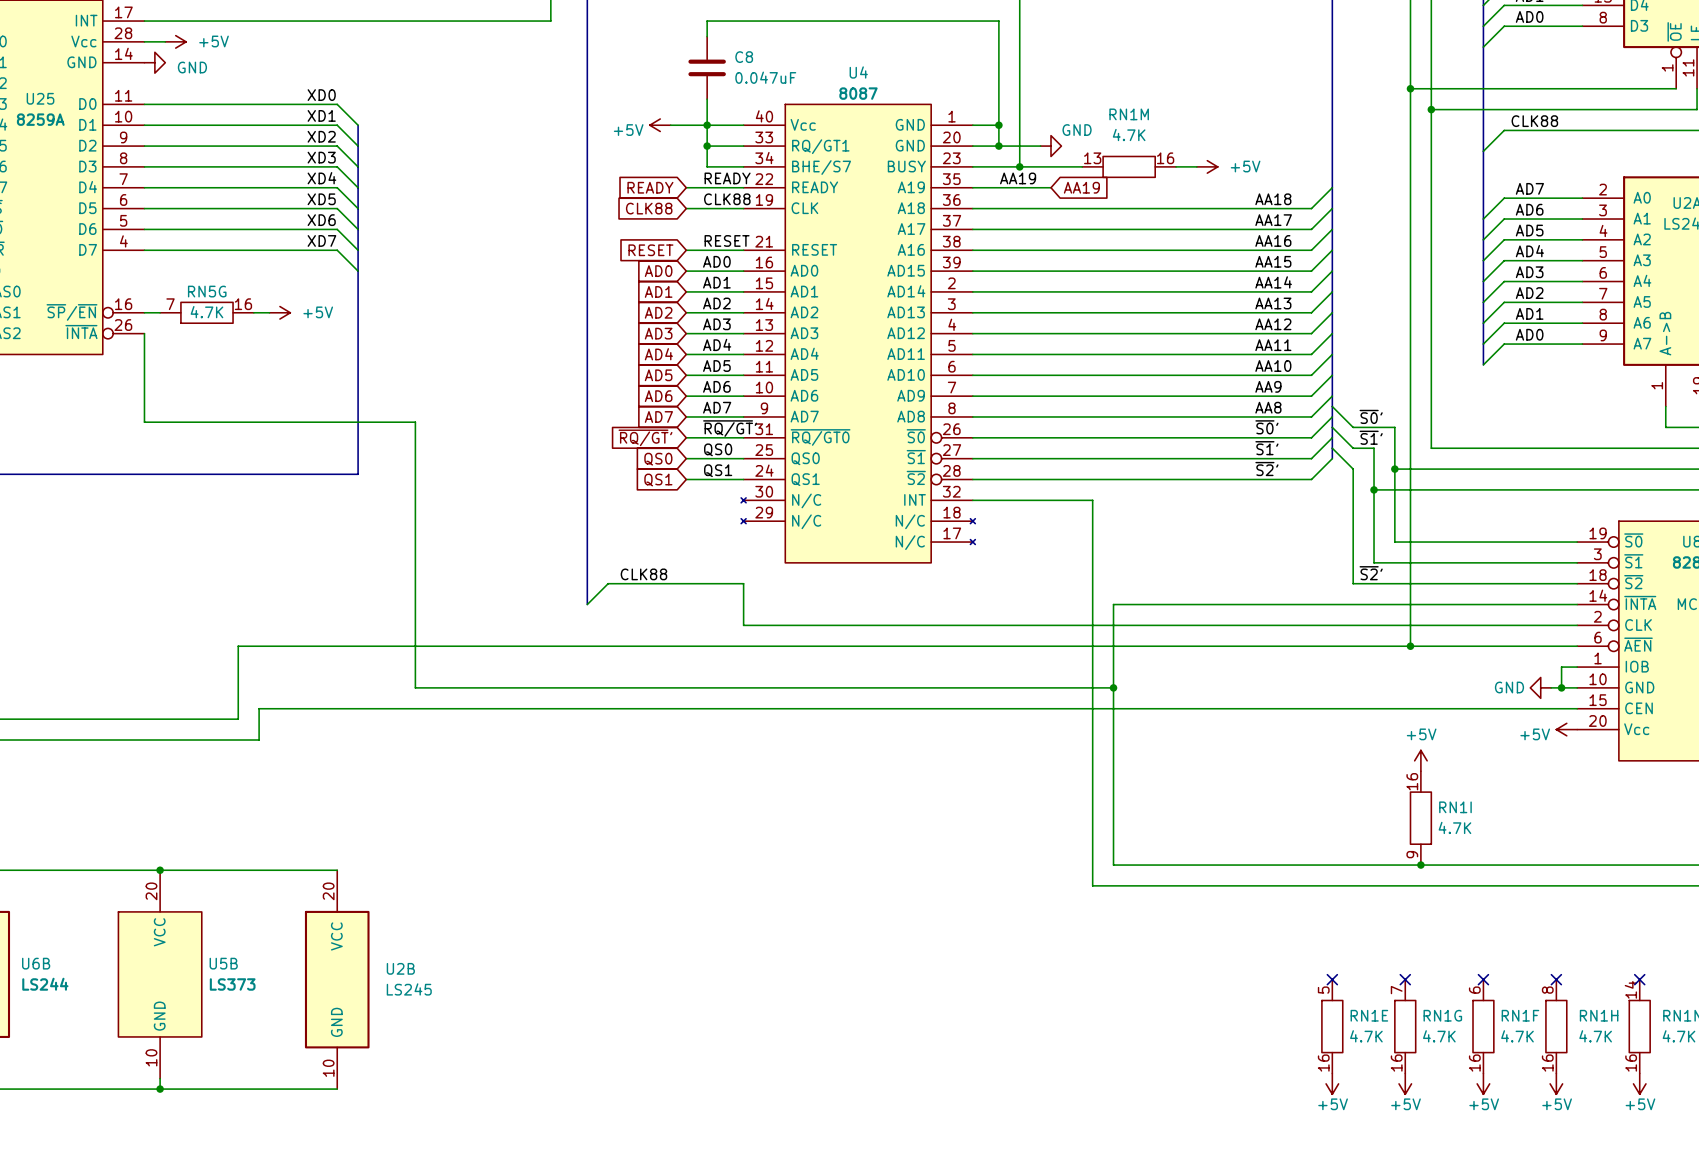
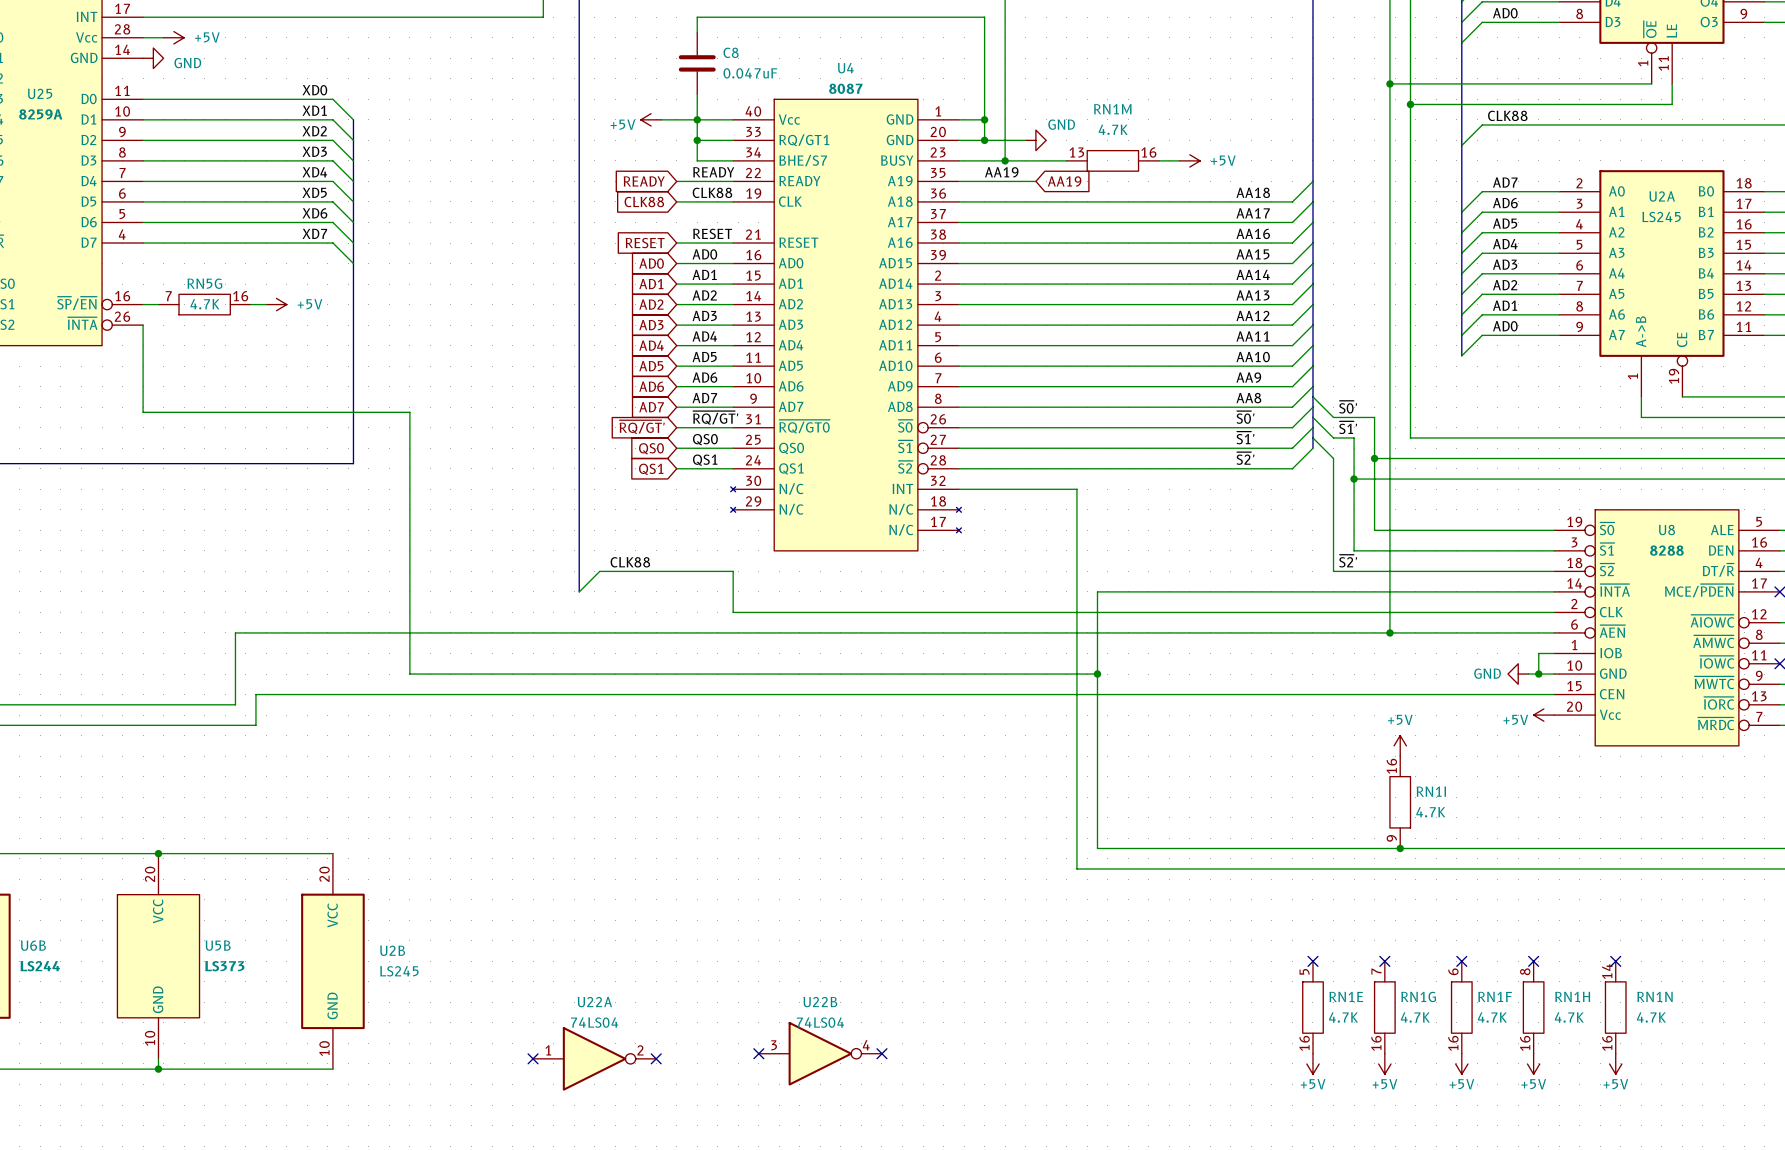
no-connect mark: none -> (758, 1053)
U22B: none -> 74LS04 (820, 1053)
no-connect mark: none -> (881, 1053)
no-connect mark: none -> (533, 1058)
U22A: none -> 74LS04 (594, 1058)
no-connect mark: none -> (656, 1058)

